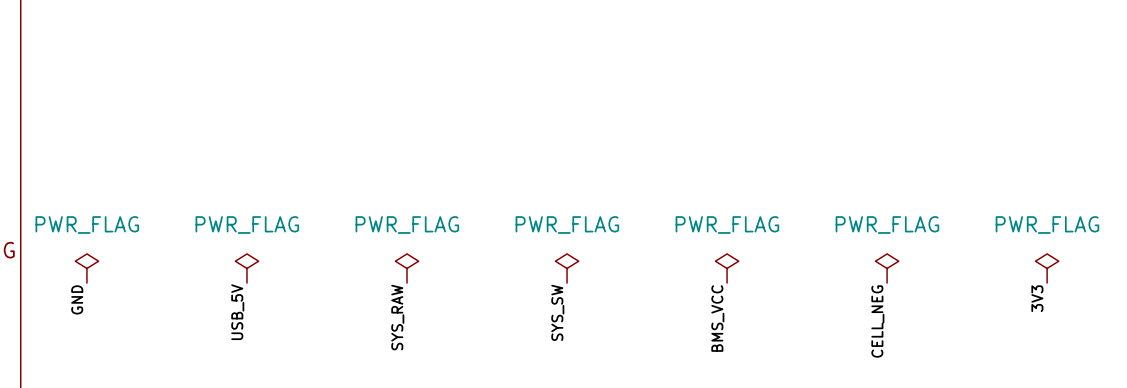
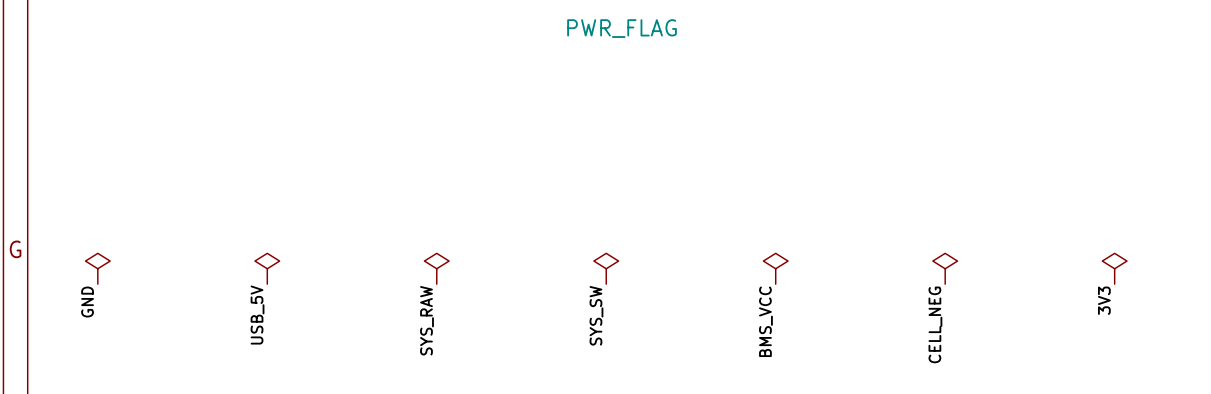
power symbol text position: PWR_FLAG (87, 224) -> PWR_FLAG (622, 28)
power symbol text: PWR_FLAG (247, 224) -> none
power symbol text: PWR_FLAG (407, 224) -> none
power symbol text: PWR_FLAG (567, 224) -> none
power symbol text: PWR_FLAG (727, 224) -> none
power symbol text: PWR_FLAG (887, 224) -> none
power symbol text: PWR_FLAG (1047, 224) -> none

